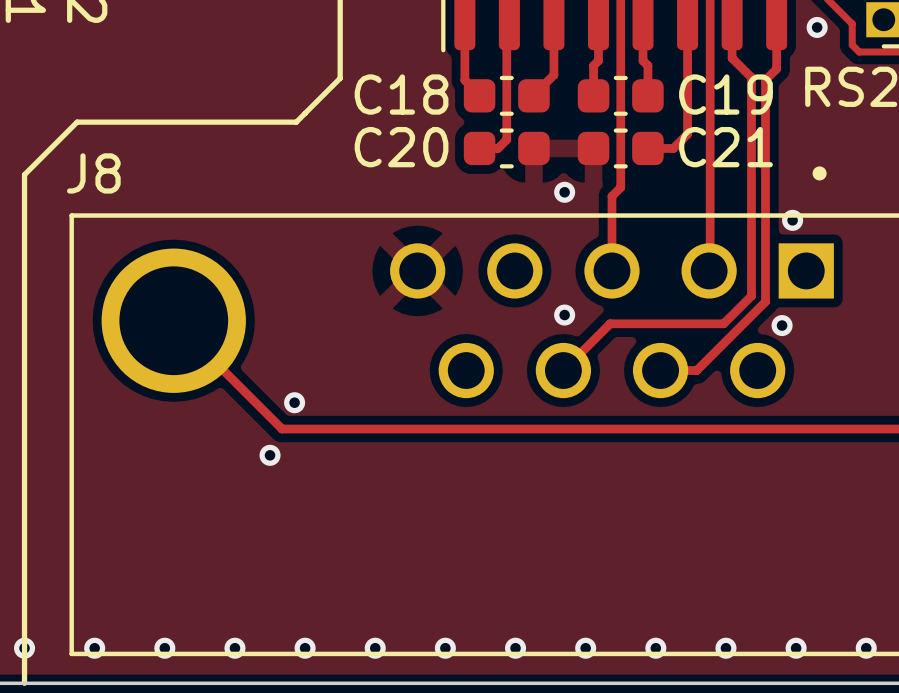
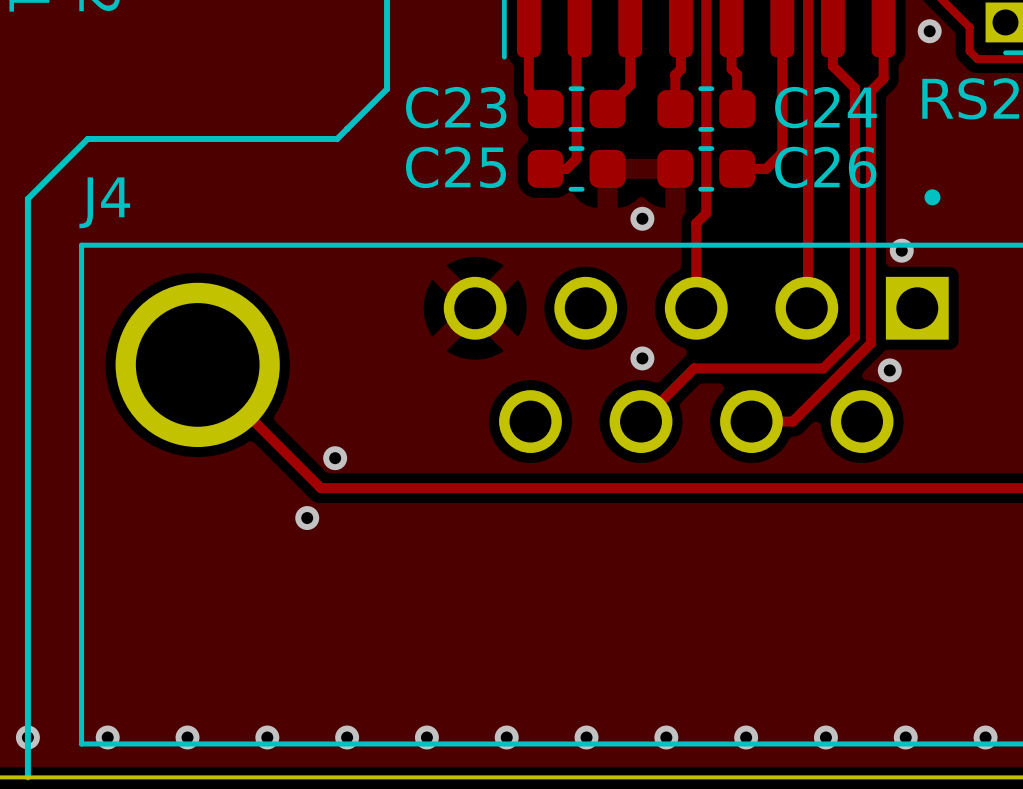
C18 name: C18 (401, 94) -> C23 (456, 107)
C19 name: C19 (725, 94) -> C24 (825, 107)
C20 name: C20 (401, 147) -> C25 (456, 167)
C21 name: C21 (725, 147) -> C26 (825, 167)
J8 name: J8 (93, 173) -> J4 (104, 202)

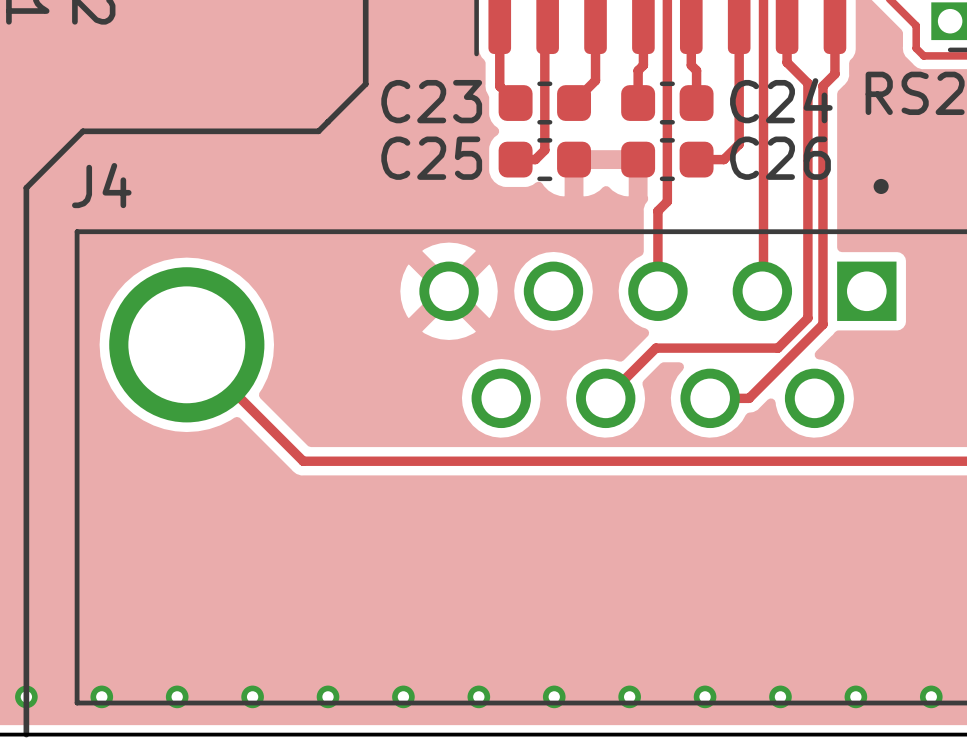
via: (929, 31) -> none
via: (642, 218) -> none
via: (901, 250) -> none
via: (642, 358) -> none
via: (889, 370) -> none
via: (335, 458) -> none
via: (307, 518) -> none

